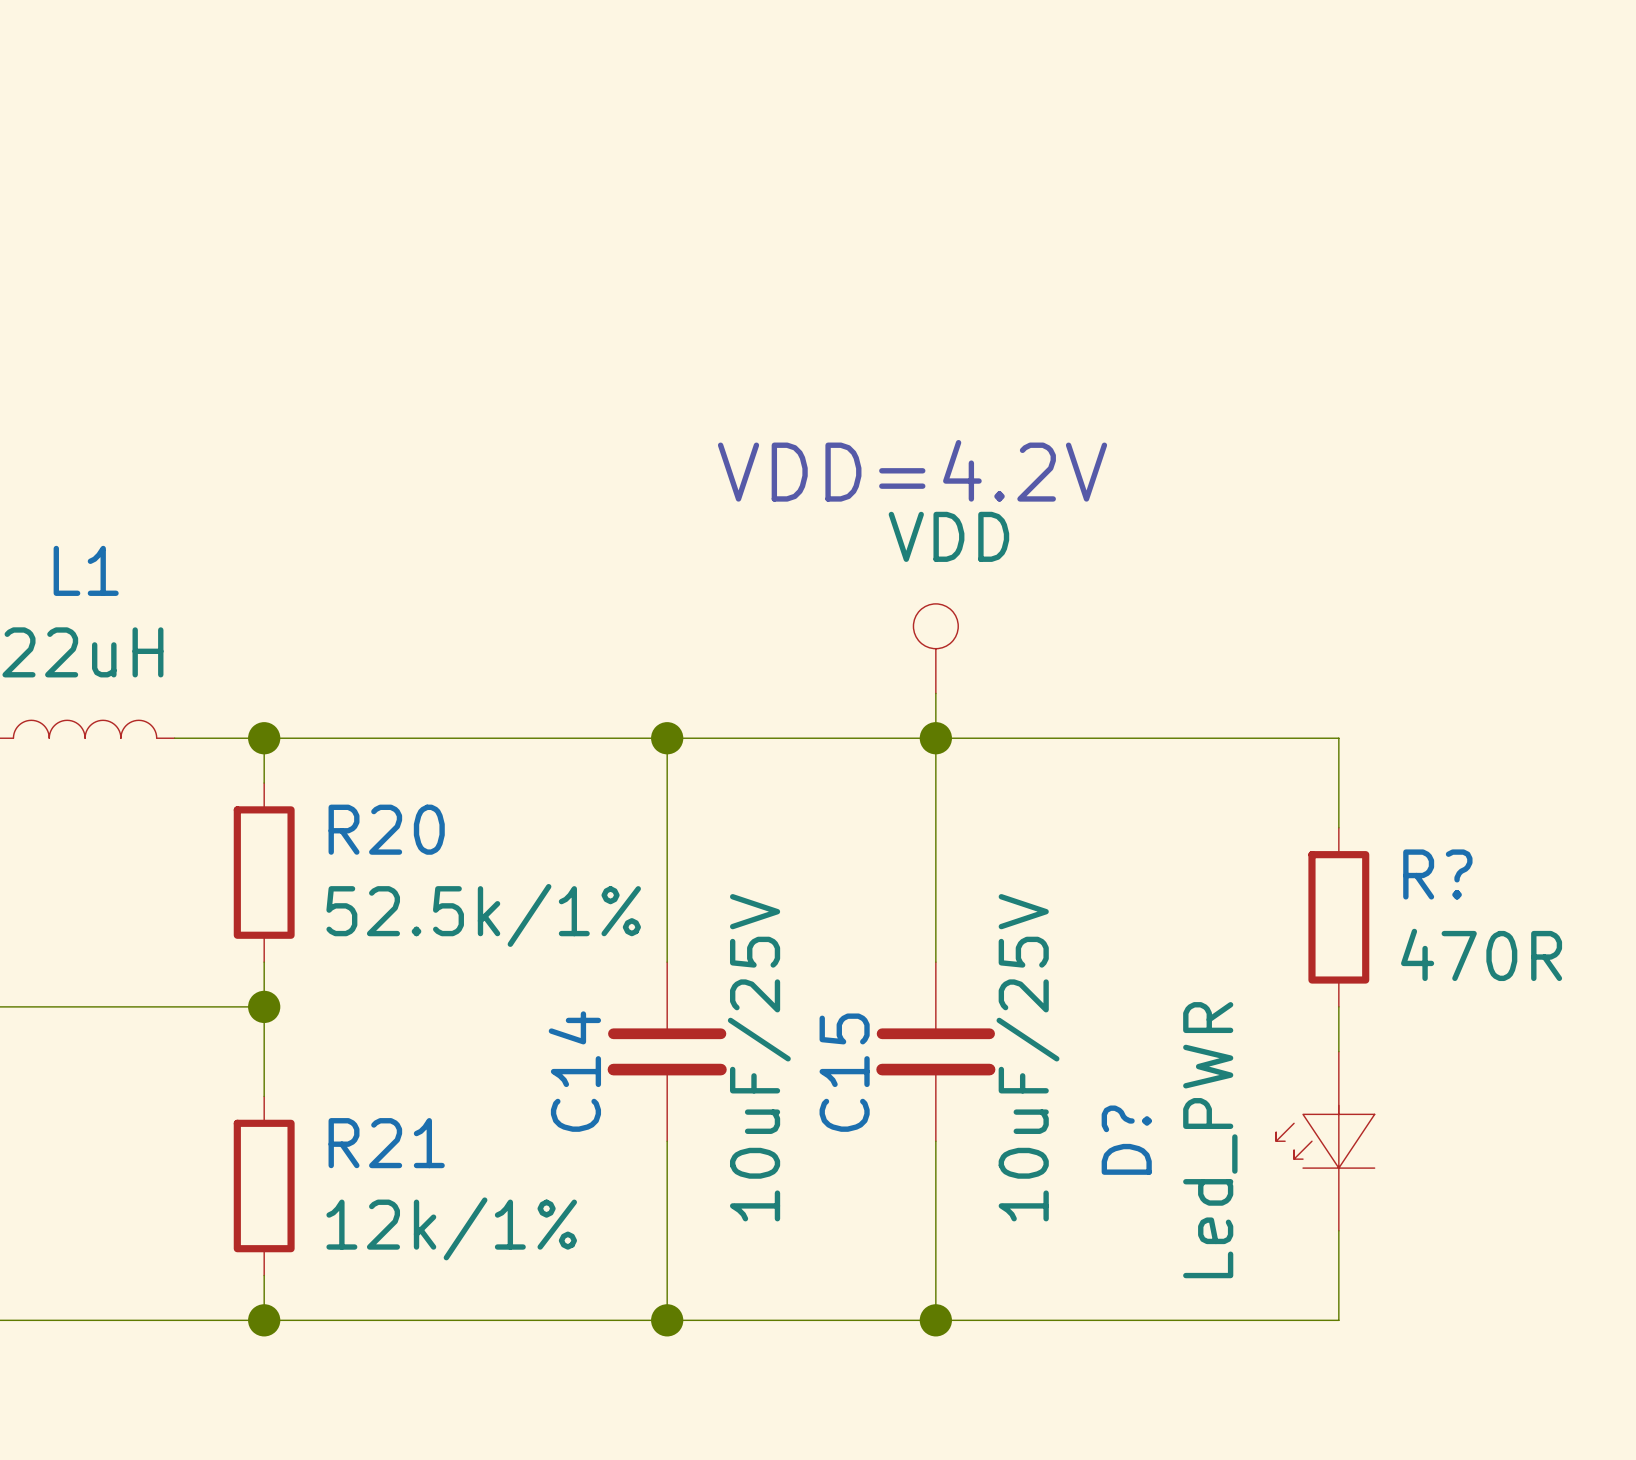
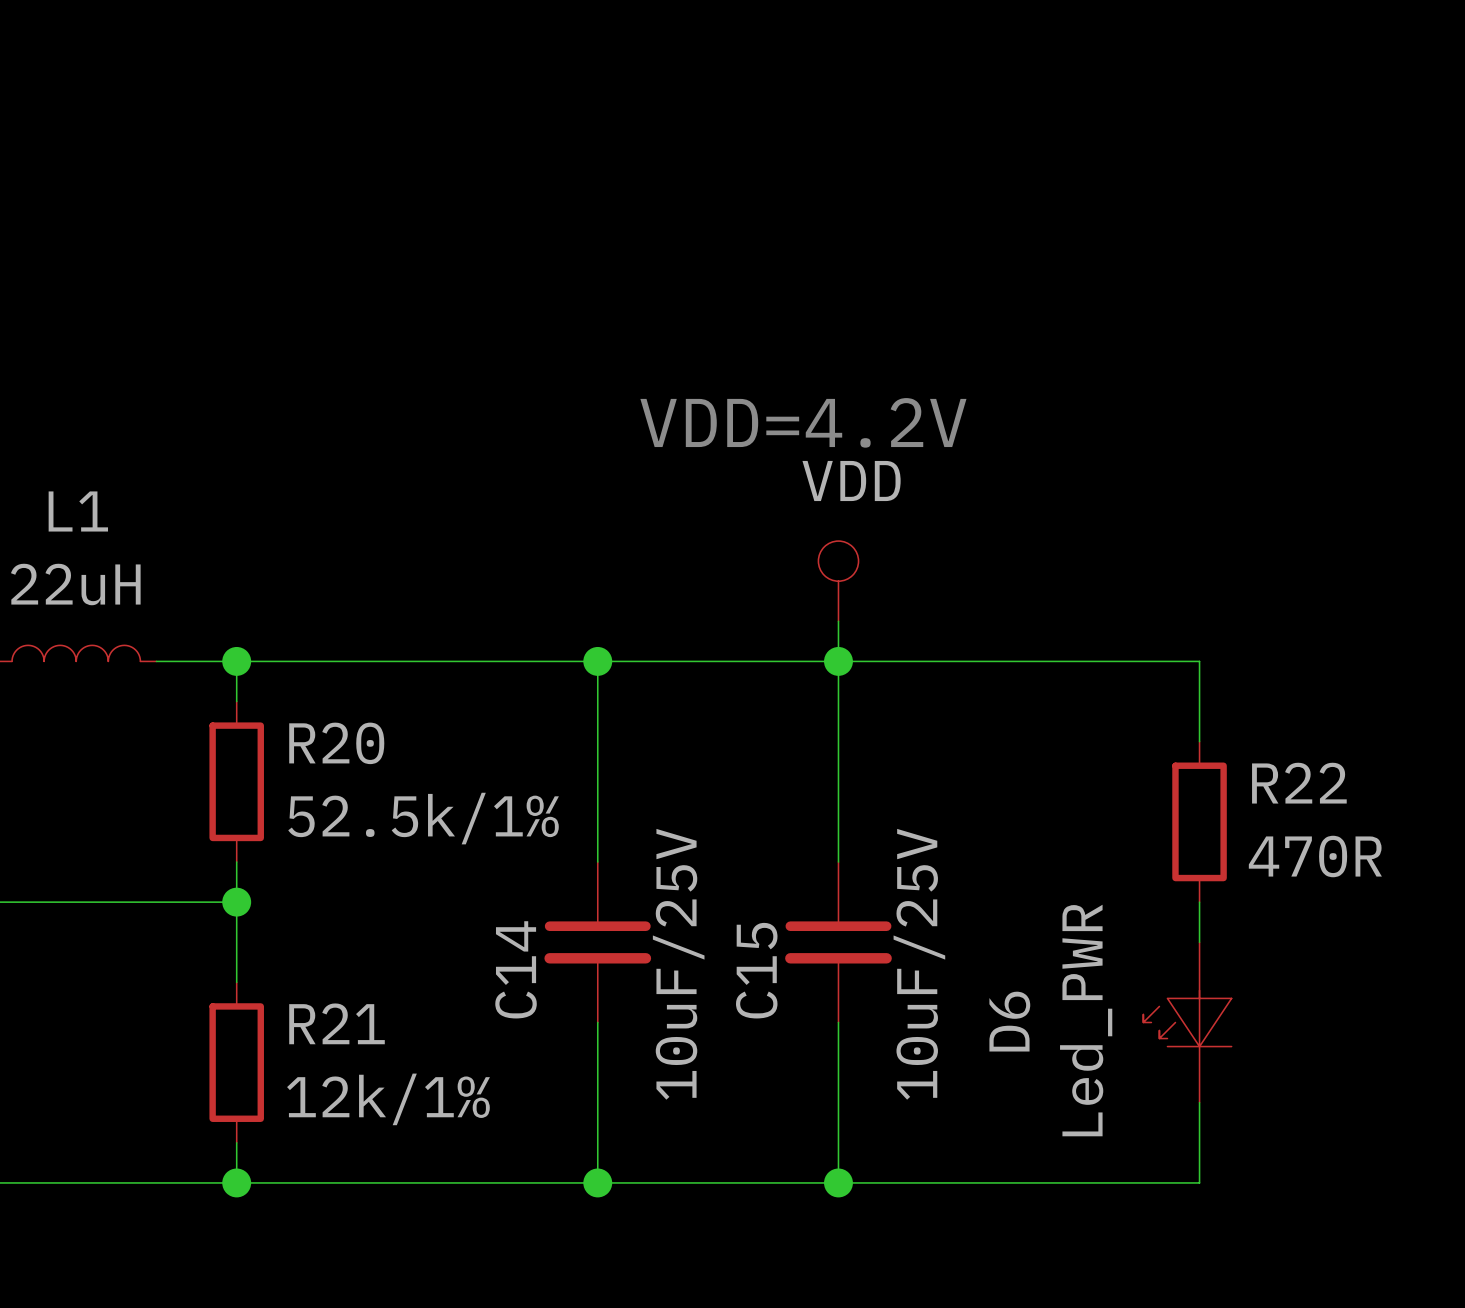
R? name: R? (1437, 874) -> R22 (1299, 783)
D? name: D? (1126, 1140) -> D6 (1009, 1021)

